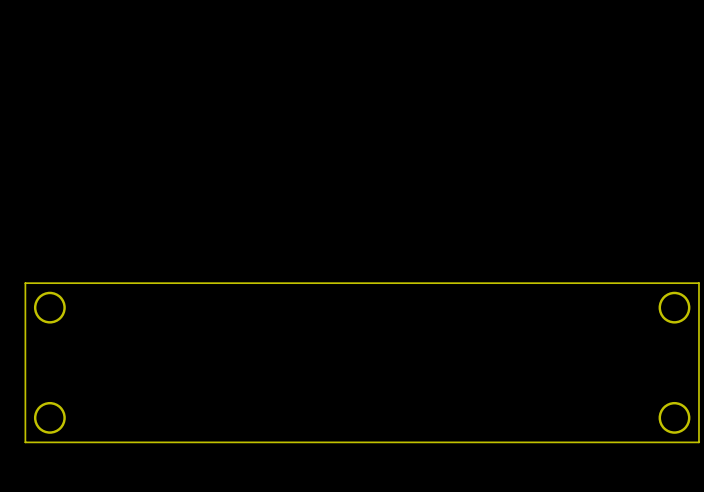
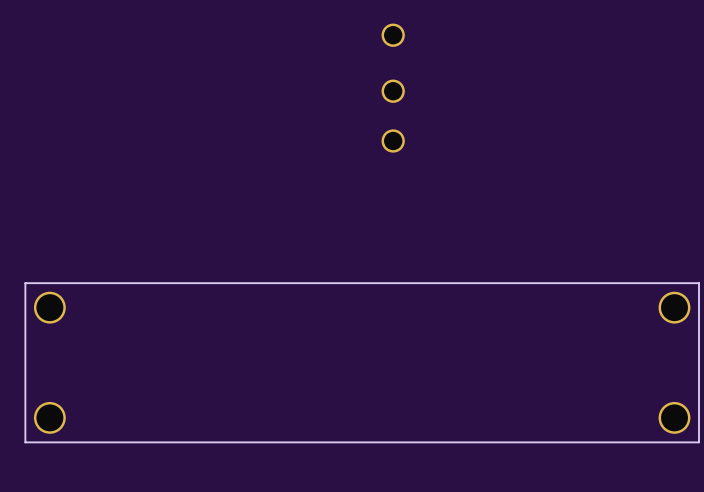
part: none -> (393, 35)
part: none -> (393, 91)
part: none -> (393, 140)

